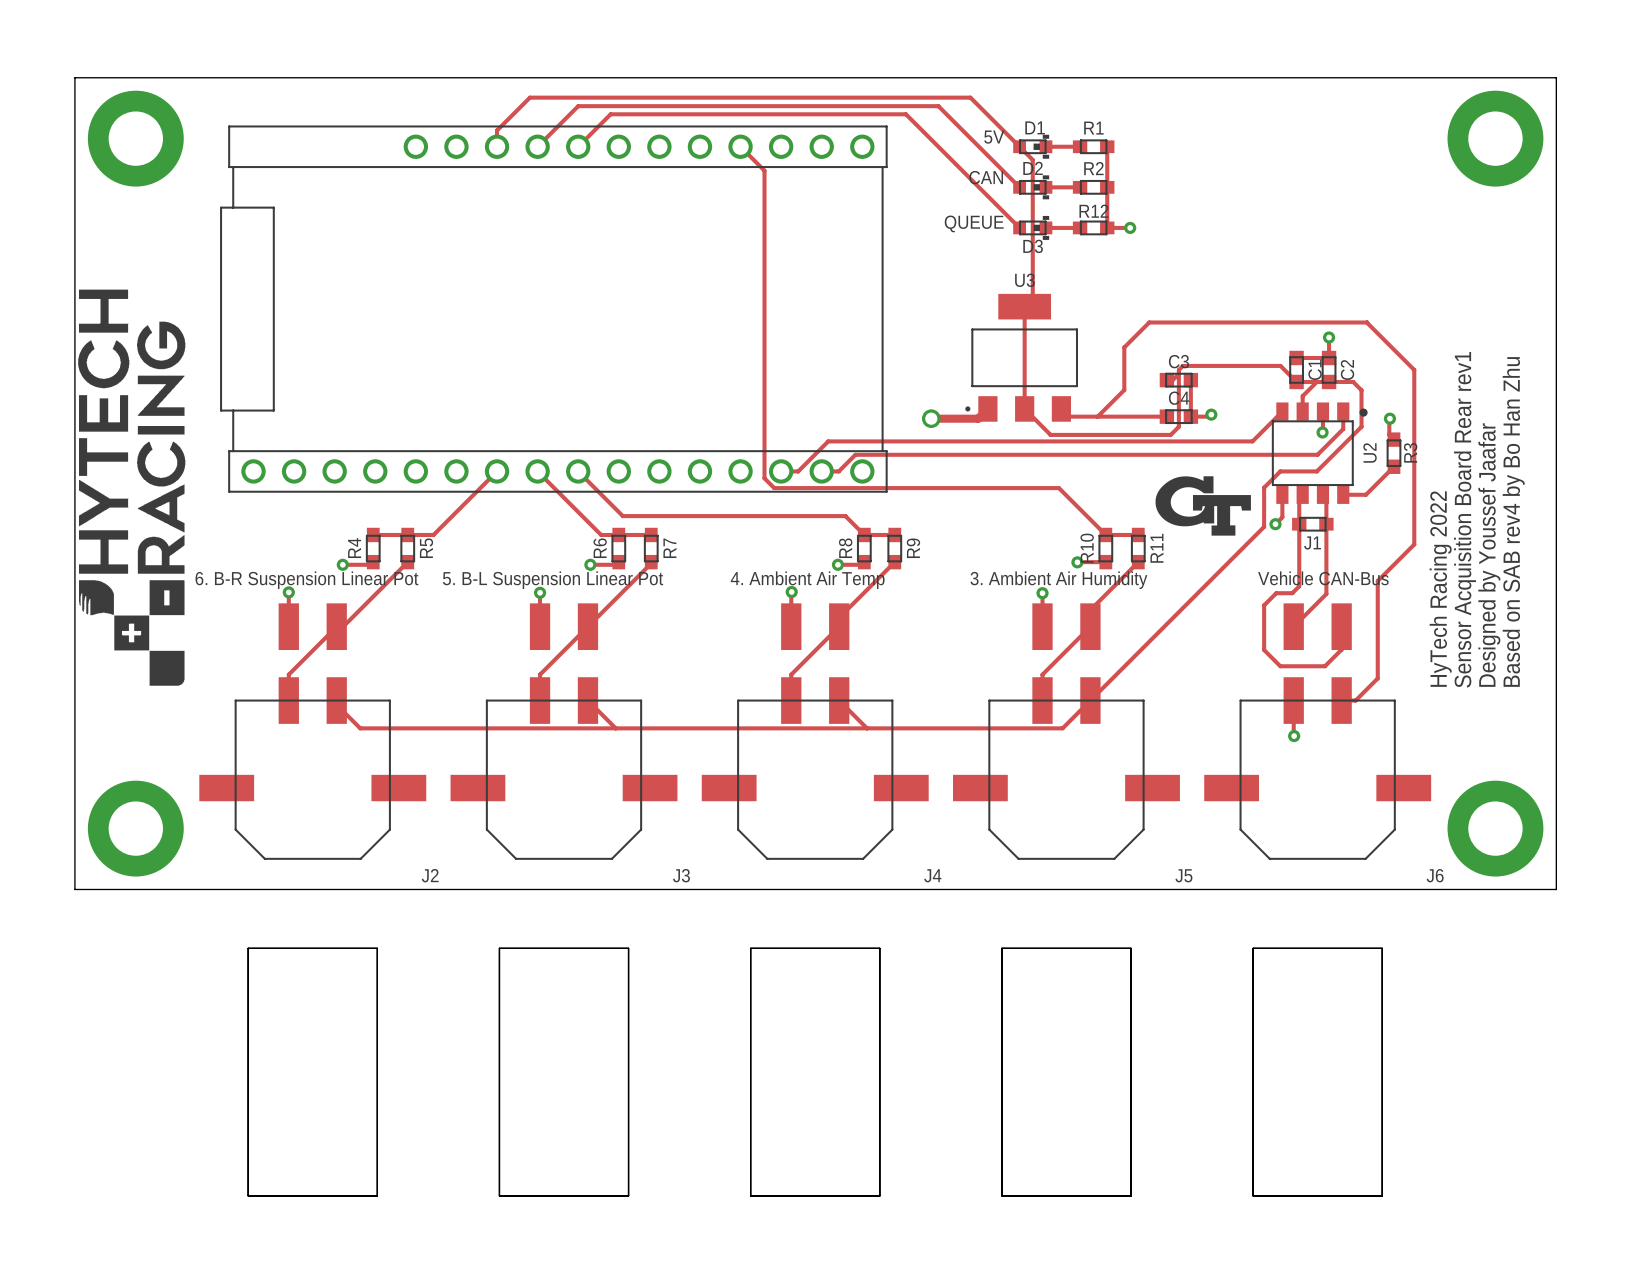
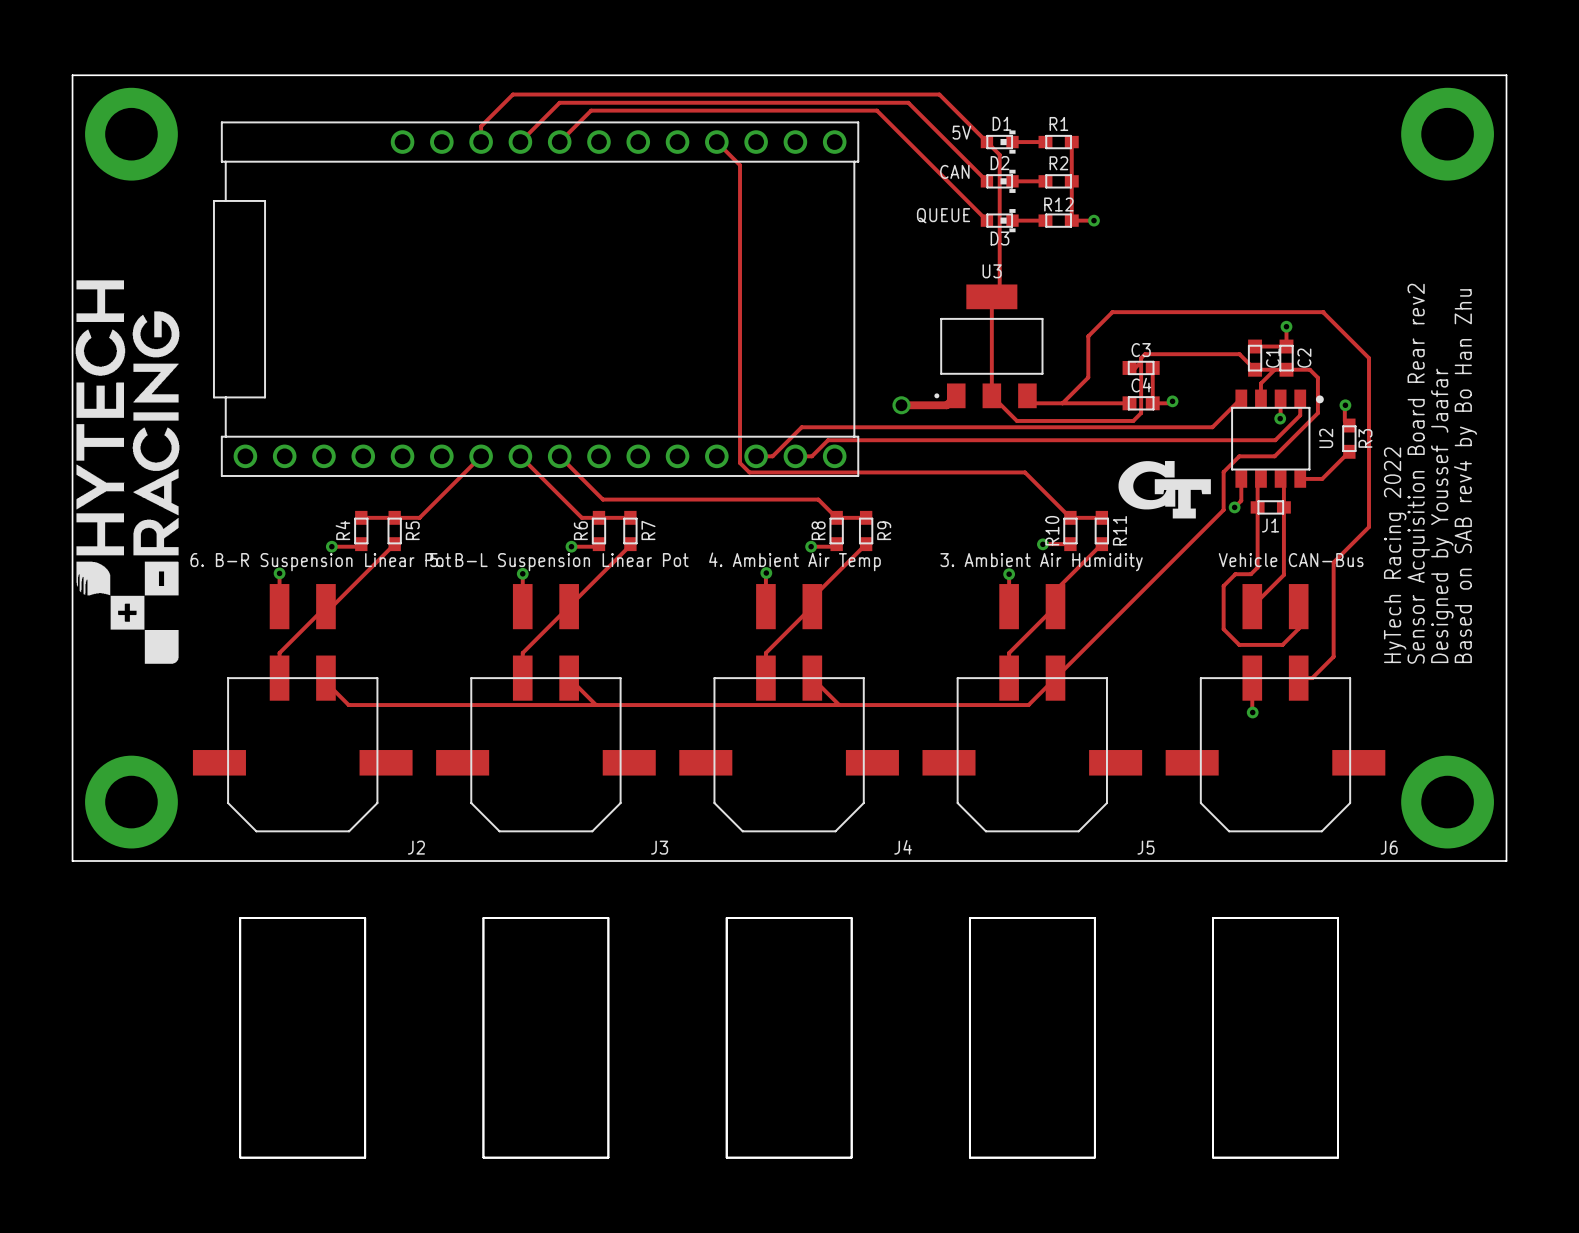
text: Sensor Acquisition Board Rear rev1 (1465, 519) -> Sensor Acquisition Board Rear rev2 (1418, 473)

